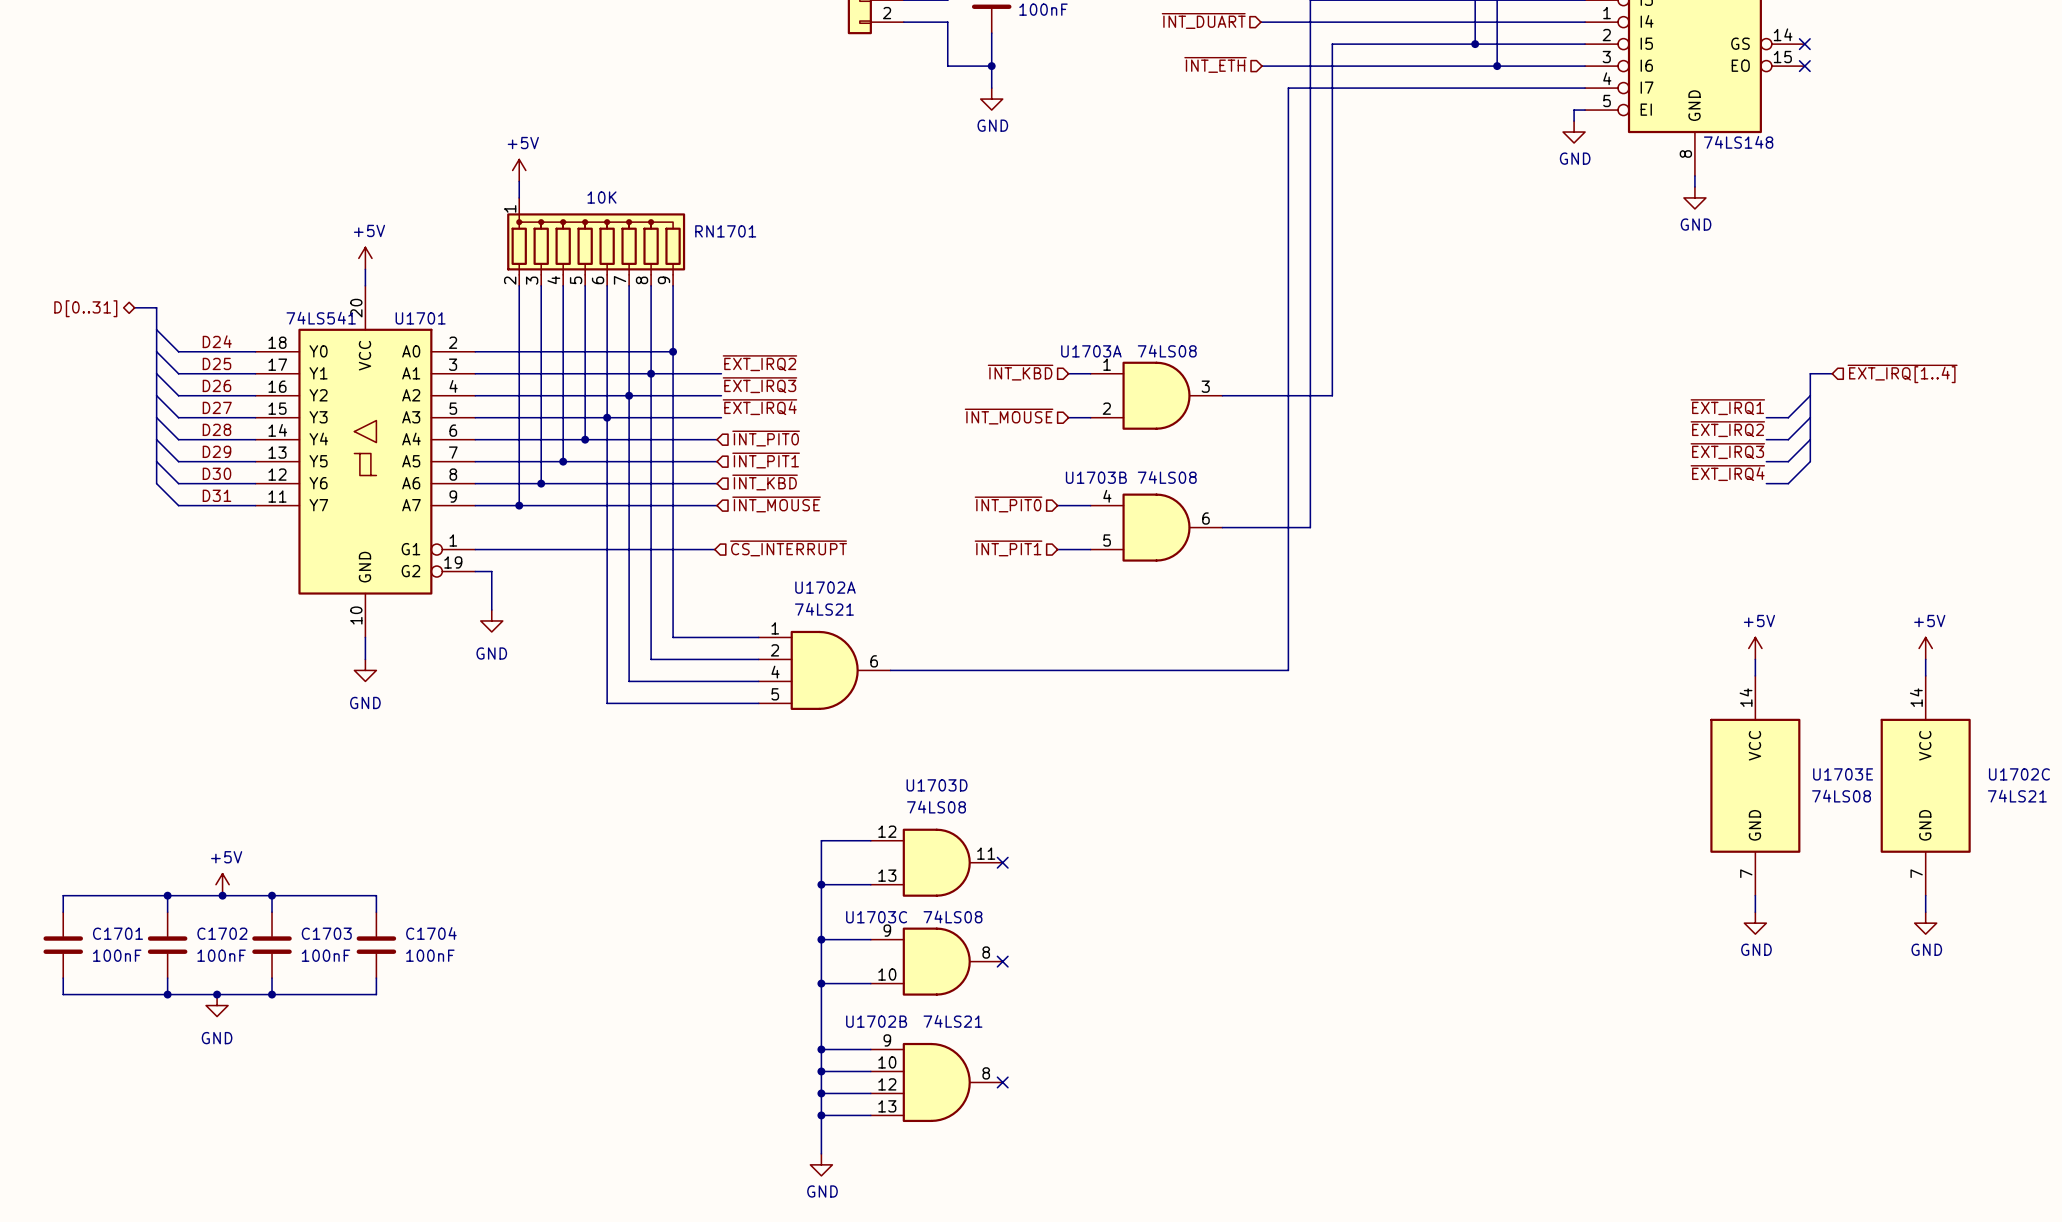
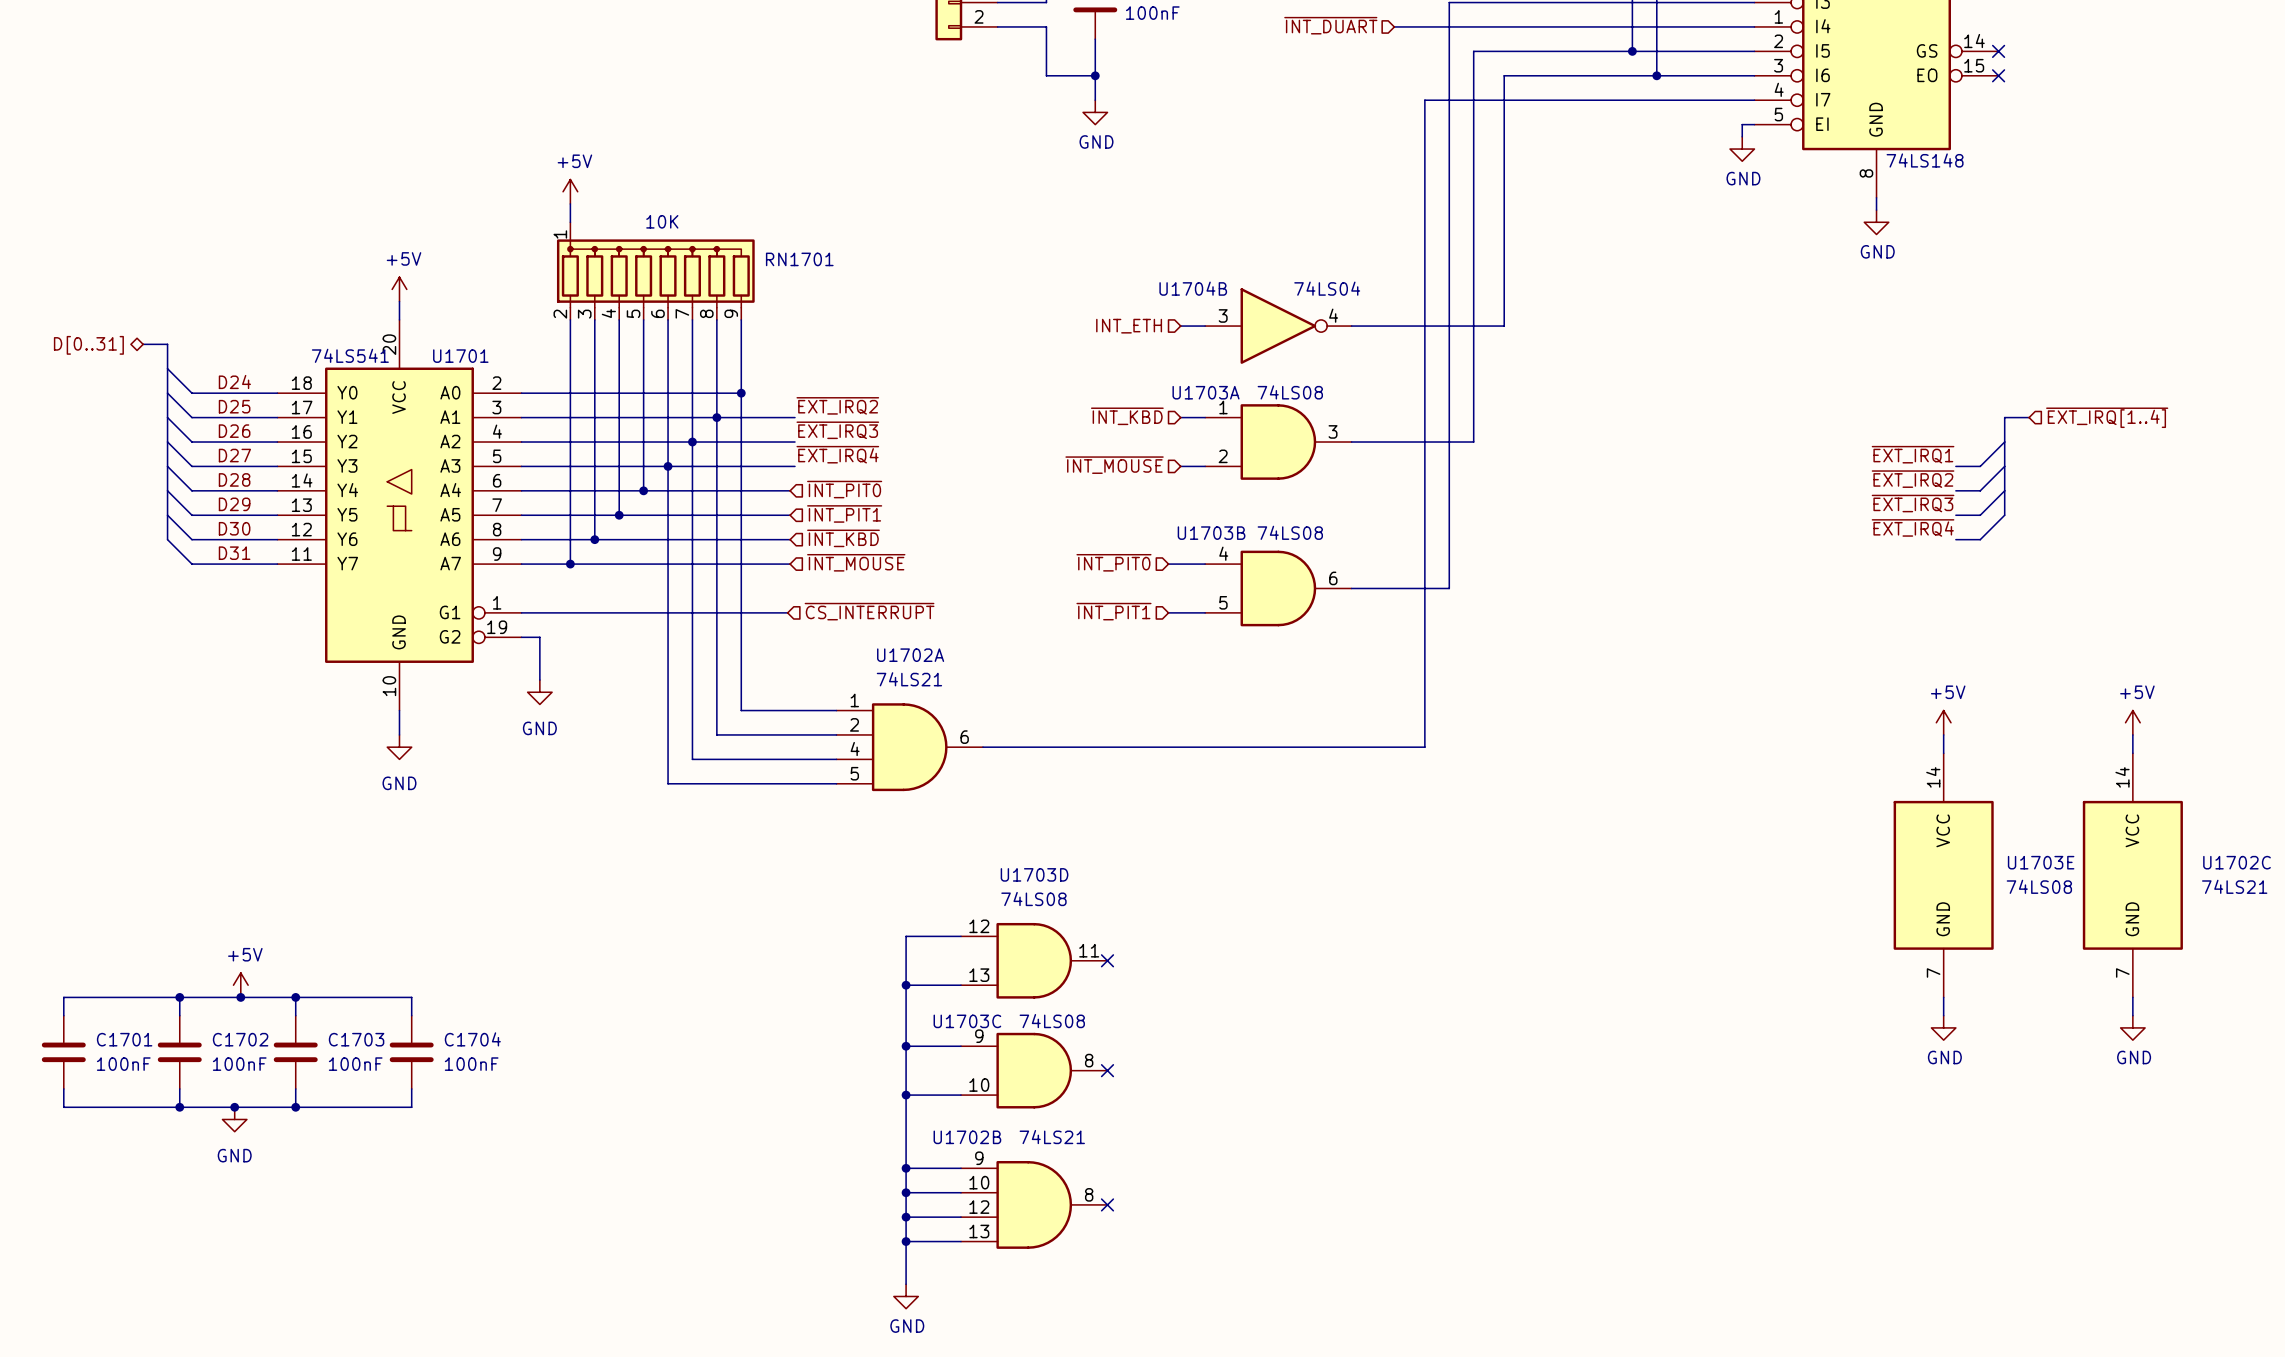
hierarchical label: ~{INT_ETH} (1215, 64) -> none
wire: (1262, 66) (1359, 66) -> (1351, 326) (1504, 326) (1504, 75)
hierarchical label: none -> INT_ETH (1129, 326)
wire: none -> (1180, 326) (1205, 326)
U1704B: none -> 74LS04 (1278, 326)

